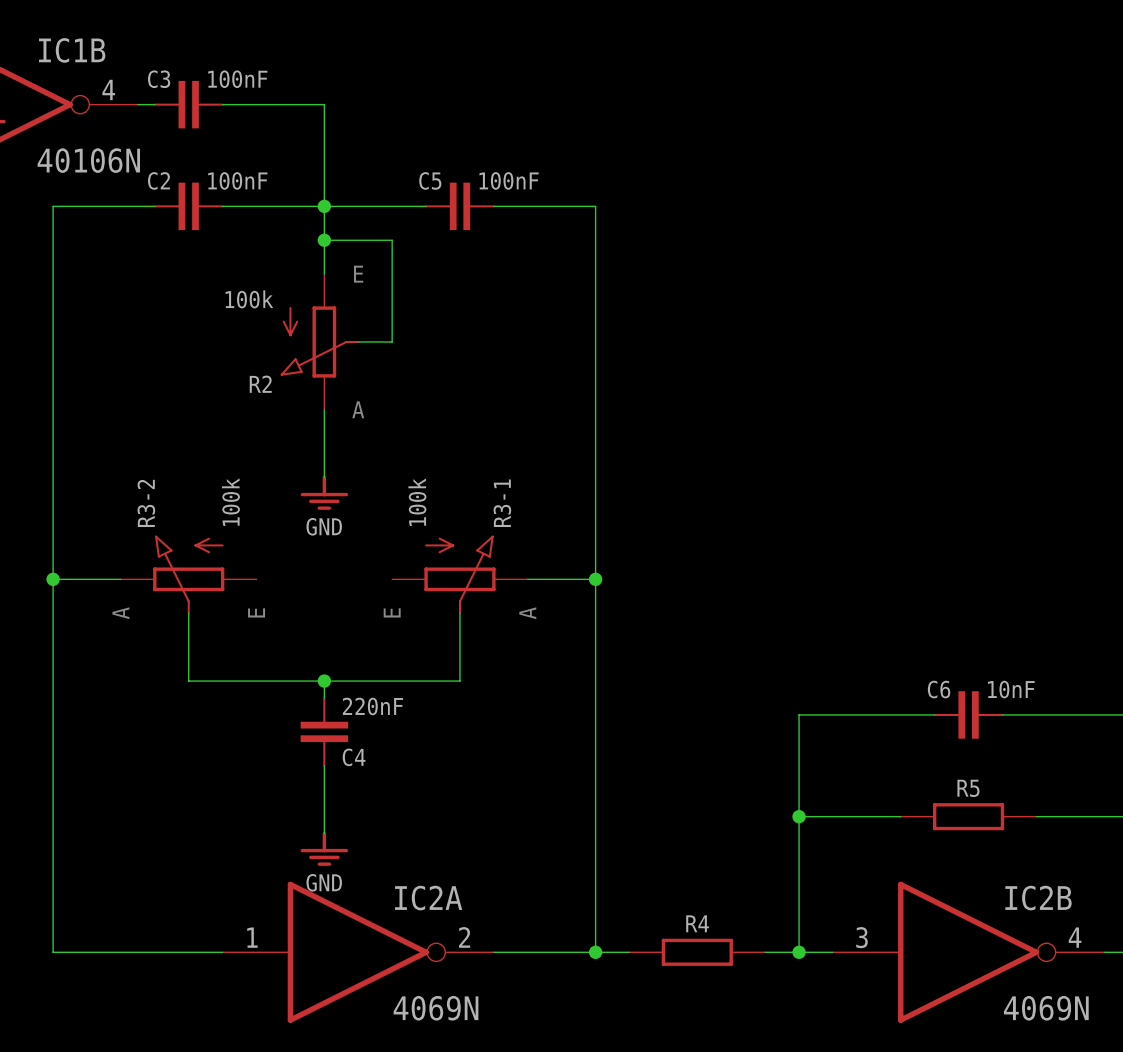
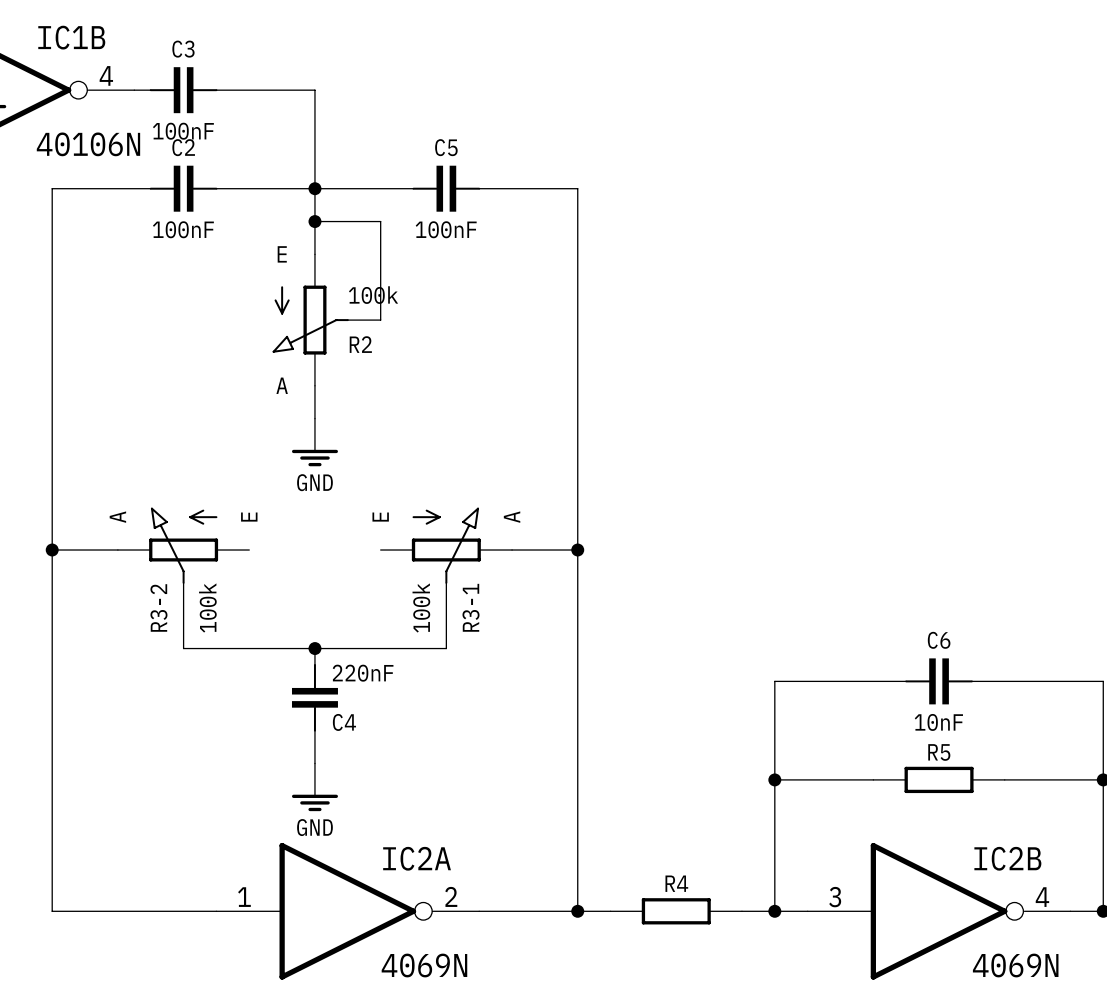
C3 name position: C3 (159, 79) -> C3 (183, 49)
C3 value position: 100nF (237, 79) -> 100nF (183, 131)
C2 name position: C2 (158, 180) -> C2 (183, 147)
C2 value position: 100nF (237, 180) -> 100nF (183, 229)
C5 name position: C5 (430, 180) -> C5 (446, 147)
C5 value position: 100nF (509, 180) -> 100nF (446, 229)
R2 text position: E (358, 274) -> E (282, 254)
R2 value position: 100k (249, 299) -> 100k (373, 295)
R2 name position: R2 (260, 384) -> R2 (360, 344)
R2 text position: A (358, 409) -> A (282, 385)
power symbol: none -> GND (314, 442)
power symbol: GND (324, 492) -> none
R3-2 value position: 100k (230, 502) -> 100k (207, 607)
R3-1 value position: 100k (417, 502) -> 100k (421, 607)
R3-2 name position: R3-2 (146, 503) -> R3-2 (158, 607)
R3-1 name position: R3-1 (502, 503) -> R3-1 (470, 607)
R3-2 text position: E (256, 612) -> E (249, 517)
R3-1 text position: E (392, 612) -> E (380, 517)
R3-2 text position: A (120, 613) -> A (117, 517)
R3-1 text position: A (527, 613) -> A (512, 517)
C6 name position: C6 (939, 689) -> C6 (939, 640)
C6 value position: 10nF (1011, 689) -> 10nF (938, 722)
power symbol: none -> GND (314, 787)
power symbol: GND (324, 848) -> none

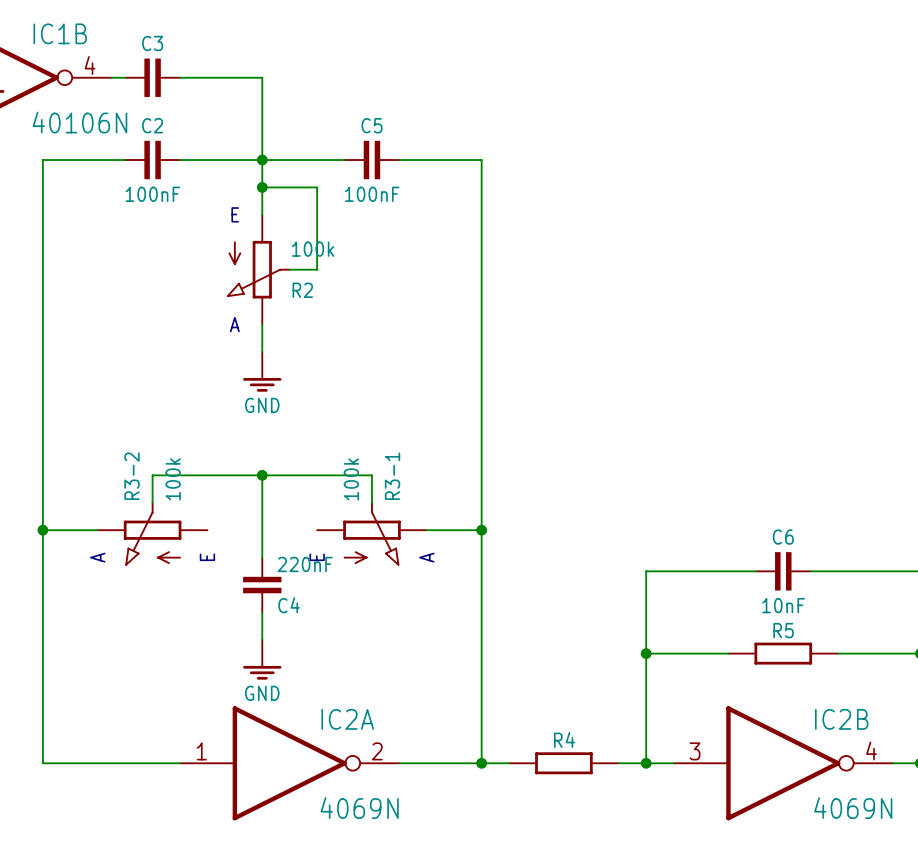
C3 value: 100nF (183, 131) -> none
R3-2 flip: as is (183, 545) -> up-down (152, 533)
R3-2 position: (183, 545) -> (152, 533)
R3-1 flip: as is (446, 545) -> up-down (371, 533)
R3-1 position: (446, 545) -> (371, 533)
wire: (52, 550) (117, 550) -> (42, 530) (97, 530)
junction: (52, 550) -> none
wire: (512, 550) (577, 550) -> (426, 530) (481, 530)
junction: (577, 550) -> none
wire: none -> (262, 475) (262, 543)
junction: none -> (262, 475)
wire: none -> (152, 489) (152, 475) (371, 475) (371, 489)
wire: (183, 599) (183, 648) (446, 648) (446, 599) -> none
junction: none -> (42, 530)
junction: none -> (481, 530)
junction: (314, 648) -> none

